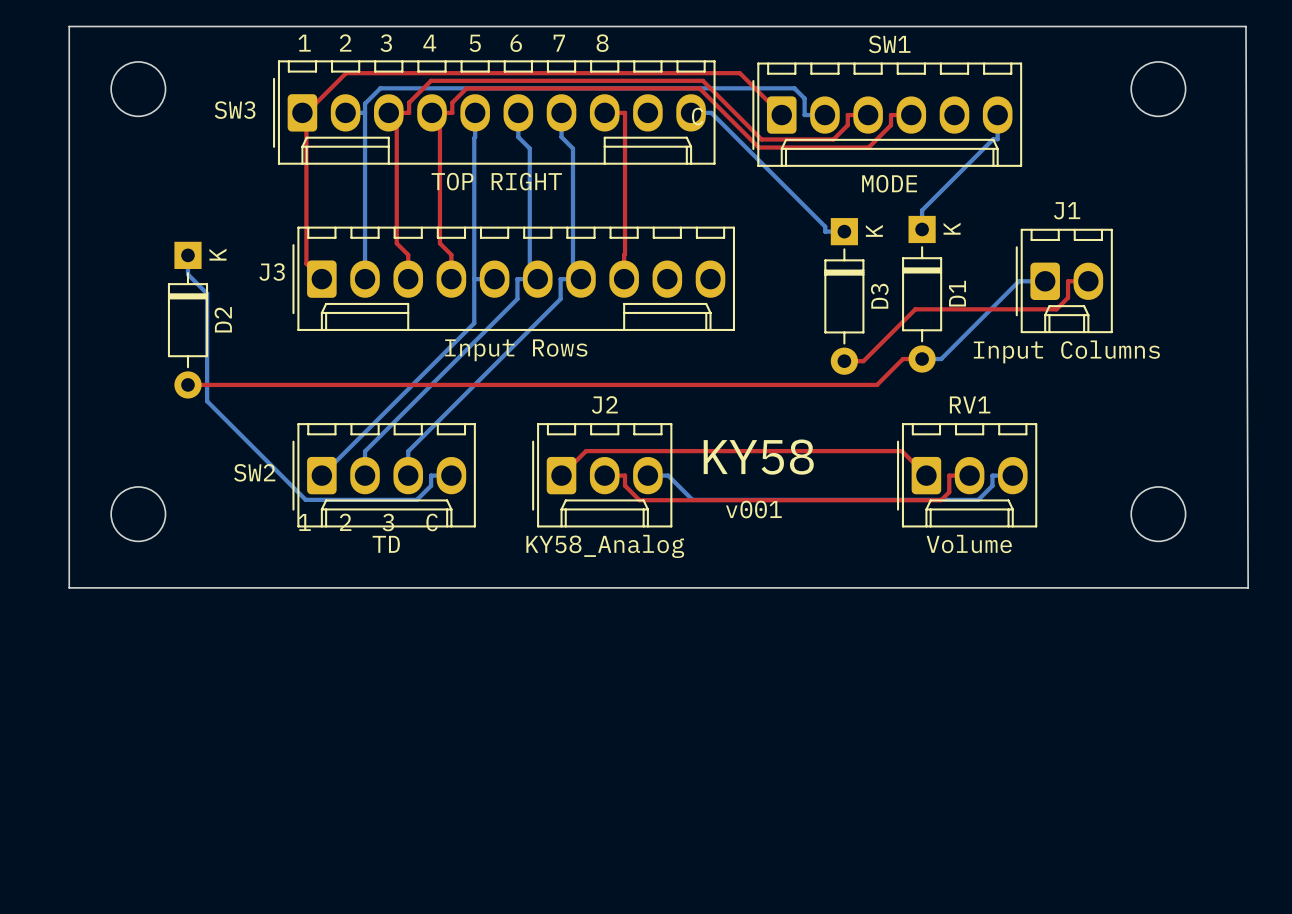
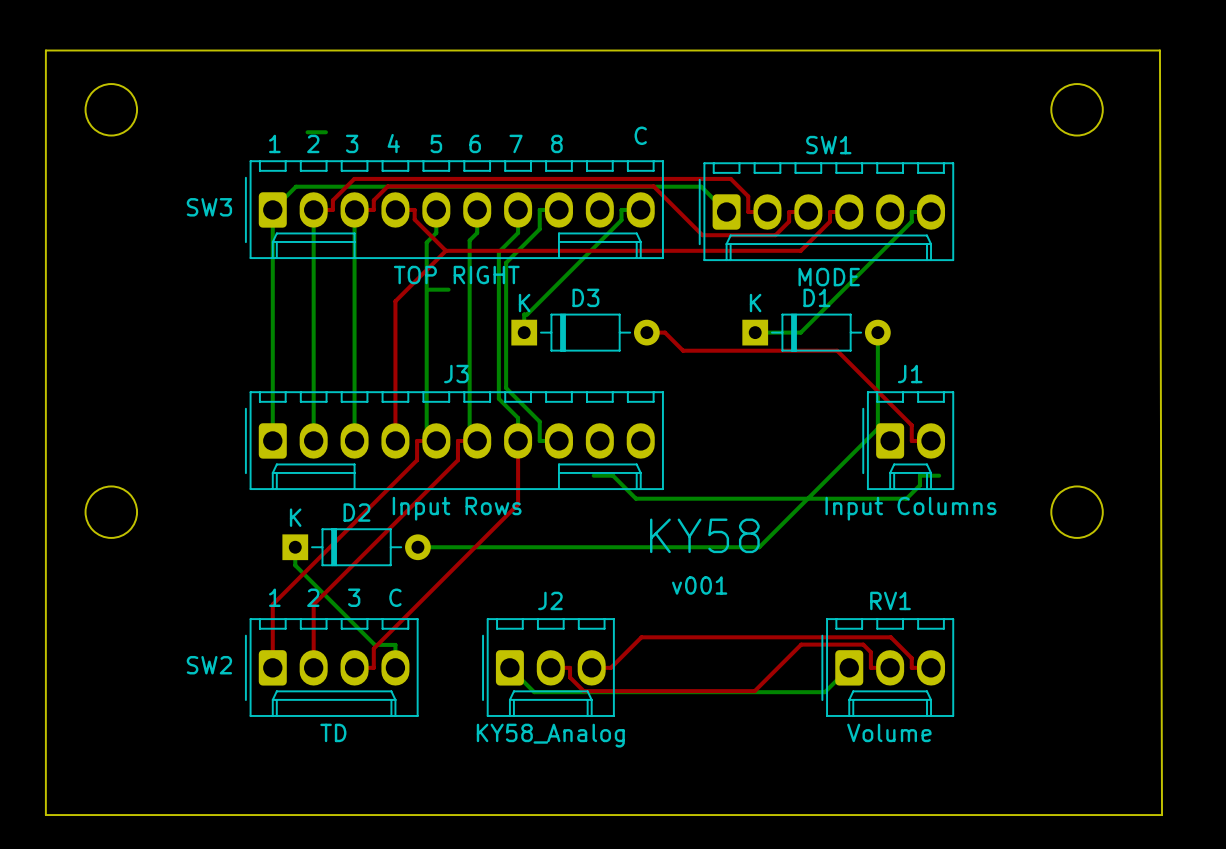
board edge: (1245, 26) (1248, 587) (69, 587) -> (1159, 50) (1162, 815) (45, 815) (45, 582)
text position: 1 (304, 43) -> 1 (274, 143)
text position: 2 (345, 43) -> 2 (313, 143)
text position: 3 (386, 43) -> 3 (352, 143)
text position: 4 (429, 43) -> 4 (393, 143)
text position: 5 (475, 43) -> 5 (436, 143)
text position: 6 (516, 43) -> 6 (475, 143)
text position: 7 (559, 43) -> 7 (516, 143)
text position: 8 (602, 43) -> 8 (556, 143)
top track: (306, 112) (306, 263) (321, 279) -> none
top track: (306, 112) (346, 73) (739, 73) (781, 115) -> none
top track: (388, 112) (409, 112) (409, 102) (431, 80) (702, 80) (761, 139) (833, 139) (847, 125) (847, 115) (868, 115) -> none
top track: (396, 112) (396, 243) (408, 254) (408, 279) -> none
top track: (431, 112) (452, 112) (452, 102) (466, 88) (699, 88) (758, 147) (868, 147) (890, 125) (890, 115) (911, 115) -> none
top track: (439, 112) (439, 243) (451, 254) (451, 279) -> none
bottom track: (475, 112) (474, 323) (321, 475) -> none
SW3 position: (494, 112) -> (454, 209)
bottom track: (518, 112) (518, 137) (529, 148) (529, 279) -> none
bottom track: (561, 112) (561, 137) (572, 148) (572, 279) -> none
top track: (604, 112) (625, 112) (624, 279) -> none
bottom track: (691, 112) (711, 112) (825, 226) (825, 231) (844, 231) -> none
SW1 position: (887, 114) -> (826, 211)
bottom track: (824, 115) (804, 115) (804, 98) (794, 88) (380, 88) (365, 103) (365, 279) -> none
bottom track: (997, 115) (997, 139) (993, 139) (922, 210) (922, 229) -> none
top track: none -> (313, 209) (332, 209) (332, 200) (354, 178) (730, 178) (748, 196) (748, 212) (767, 212)
bottom track: none -> (313, 209) (313, 440)
top track: none -> (354, 209) (373, 209) (373, 200) (387, 186) (653, 186) (702, 235) (775, 235) (789, 221) (789, 212) (808, 212)
bottom track: none -> (354, 209) (354, 440)
top track: none -> (395, 209) (414, 209) (414, 219) (445, 250)
bottom track: none -> (436, 209) (436, 232) (426, 242) (426, 440) (436, 440)
bottom track: none -> (477, 209) (477, 232) (469, 240) (469, 440) (477, 440)
bottom track: none -> (518, 209) (518, 232) (498, 252) (498, 398) (518, 418) (518, 440)
bottom track: none -> (558, 209) (539, 209) (539, 229) (506, 262) (506, 388) (539, 421) (539, 440) (558, 440)
bottom track: none -> (640, 209) (621, 209) (621, 220) (527, 314) (524, 314) (524, 332)
bottom track: none -> (726, 212) (701, 186) (296, 186) (272, 209) (272, 440)
top track: none -> (849, 212) (830, 212) (830, 221) (800, 250) (445, 250)
bottom track: none -> (931, 212) (911, 212) (911, 221) (800, 332) (755, 332)
top track: none -> (445, 250) (395, 301) (395, 440)
bottom track: (187, 255) (187, 274) (207, 293) (207, 401) (305, 499) (417, 499) (431, 485) (431, 475) (451, 475) -> none
J3 name position: J3 (272, 272) -> J3 (456, 374)
J3 position: (513, 278) -> (454, 440)
bottom track: (537, 279) (517, 279) (517, 298) (365, 451) (365, 475) -> none
bottom track: (580, 279) (560, 279) (560, 298) (408, 451) (408, 475) -> none
J1 position: (1064, 280) -> (908, 440)
bottom track: (1045, 281) (1018, 281) (941, 359) (922, 359) -> none
top track: (1088, 281) (1068, 281) (1068, 297) (1056, 309) (915, 309) (863, 361) (844, 361) -> none
D1 rotation: 0° (922, 294) -> 90° counterclockwise (816, 332)
D3 rotation: 0° (844, 296) -> 90° counterclockwise (585, 332)
D3 position: (844, 296) -> (585, 332)
D2 rotation: 0° (187, 320) -> 90° counterclockwise (356, 547)
D2 position: (187, 320) -> (356, 547)
top track: none -> (646, 332) (664, 332) (683, 350) (837, 350) (911, 425) (911, 440) (931, 440)
bottom track: none -> (877, 332) (877, 428)
top track: (922, 359) (902, 359) (877, 384) (187, 384) -> none
bottom track: none -> (877, 428) (759, 547) (417, 547)
top track: none -> (436, 440) (417, 440) (417, 460) (272, 604) (272, 667)
top track: none -> (477, 440) (457, 440) (457, 460) (313, 604) (313, 667)
top track: none -> (518, 440) (518, 504) (373, 648) (373, 667) (354, 667)
text position: KY58 (758, 457) -> KY58 (704, 535)
SW2 position: (384, 475) -> (331, 667)
top track: (561, 475) (586, 451) (901, 451) (926, 475) -> none
J2 position: (602, 475) -> (548, 667)
top track: (604, 475) (625, 475) (625, 485) (639, 500) (941, 500) (949, 492) (949, 475) (969, 475) -> none
RV1 position: (967, 475) -> (887, 667)
text position: v001 (753, 509) -> v001 (699, 585)
text position: 1 (304, 522) -> 1 (274, 597)
text position: 2 (345, 522) -> 2 (313, 597)
text position: 3 (388, 522) -> 3 (354, 597)
text position: C (432, 522) -> C (395, 597)
bottom track: none -> (295, 547) (295, 565) (374, 644) (395, 644) (395, 667)
bottom track: none -> (509, 667) (534, 692) (824, 692) (849, 667)
top track: none -> (550, 667) (570, 667) (570, 677) (583, 691) (754, 691) (801, 644) (863, 644) (870, 652) (870, 667) (890, 667)
top track: none -> (591, 667) (610, 667) (641, 637) (890, 637) (911, 658) (911, 667) (931, 667)

